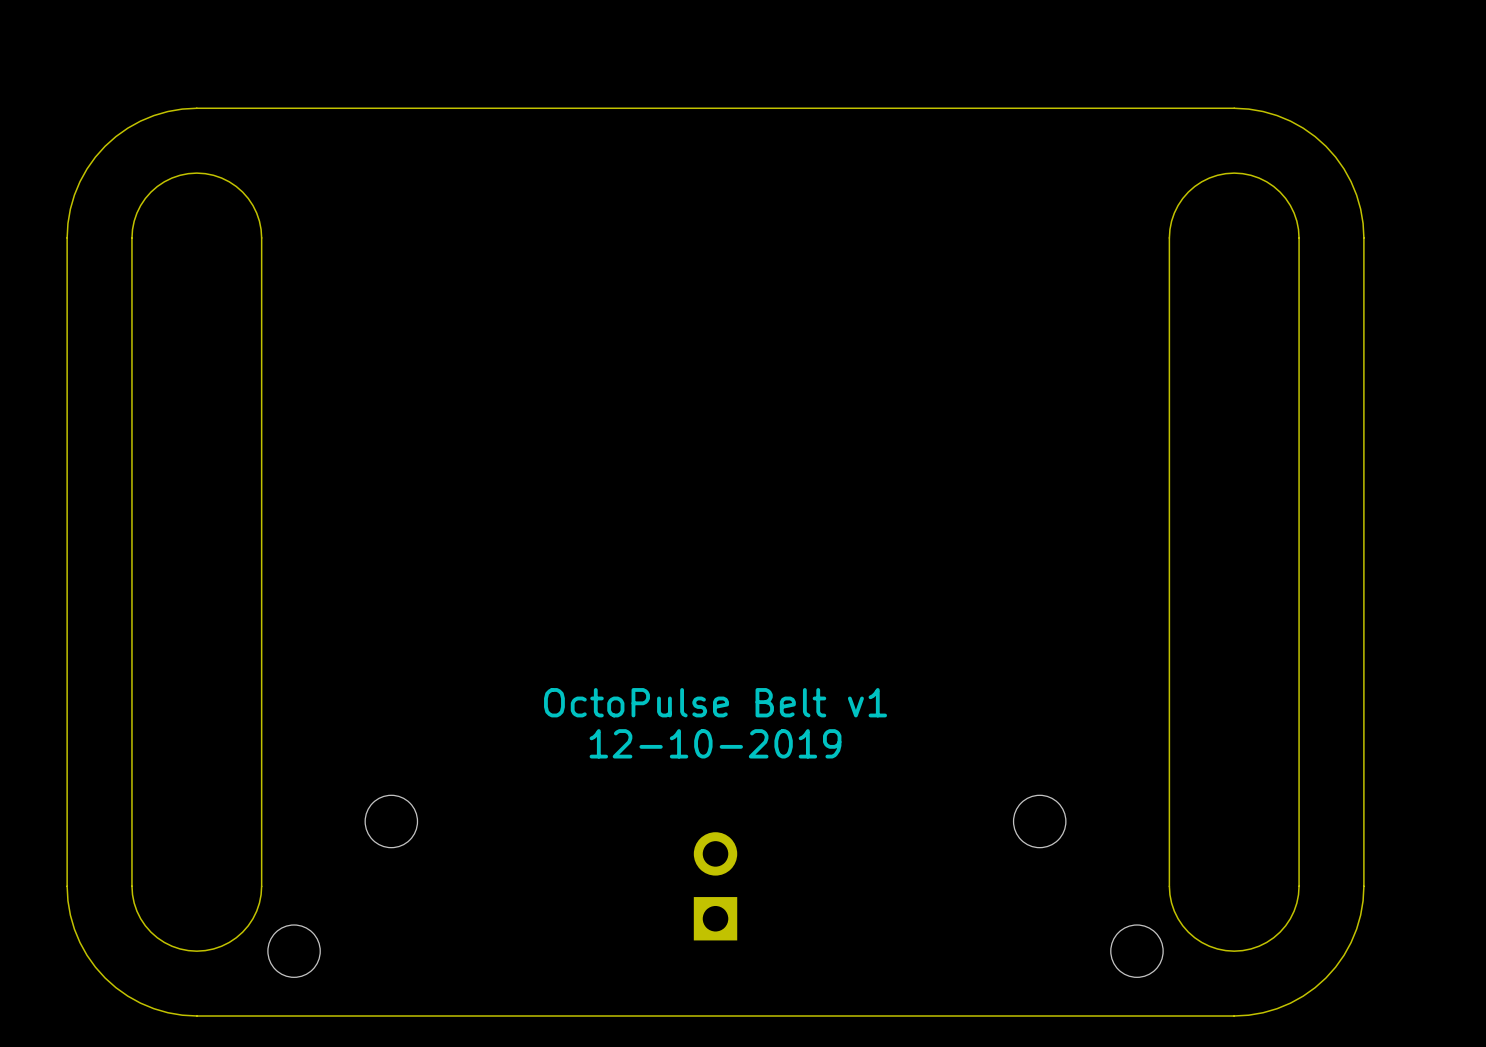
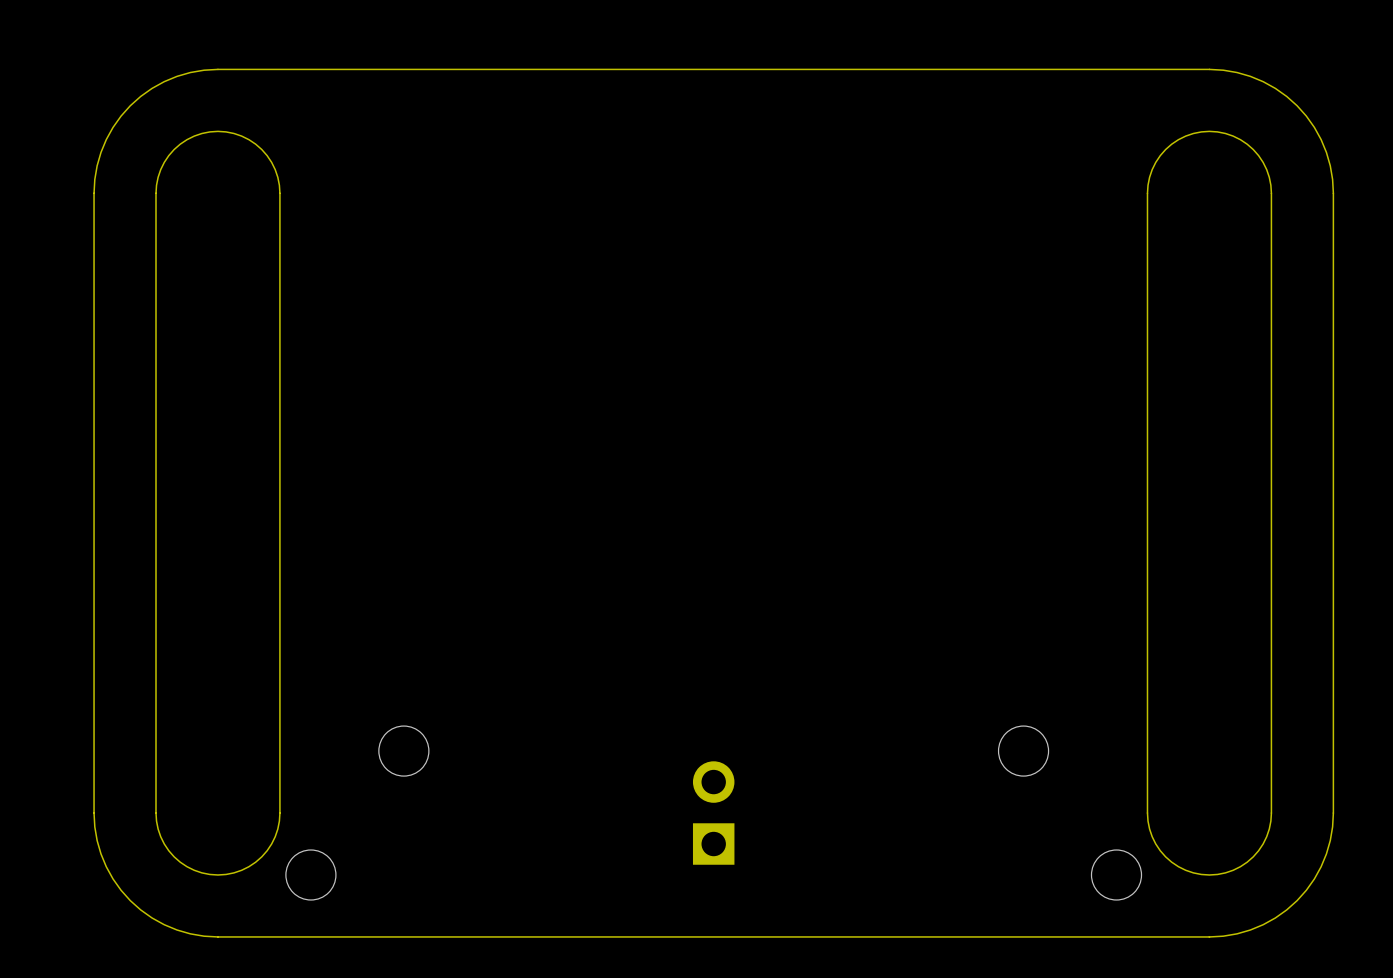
text: OctoPulse Belt v1 (715, 702) -> none
text: 12-10-2019 (715, 743) -> none

